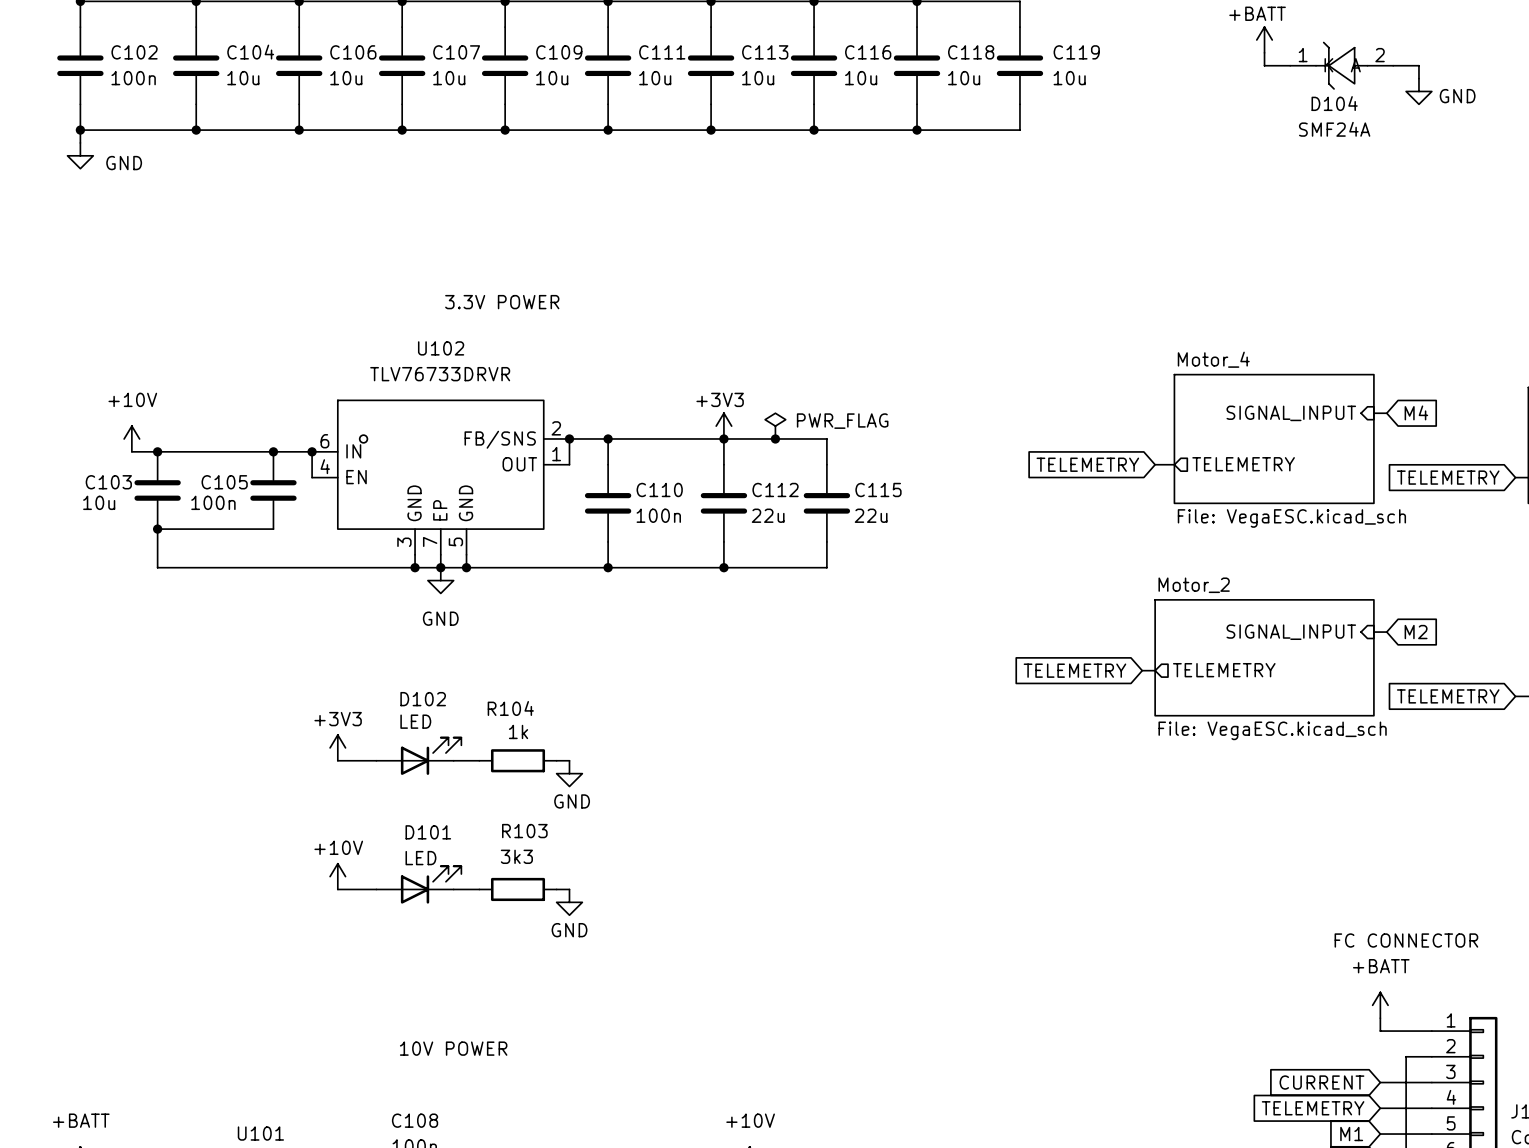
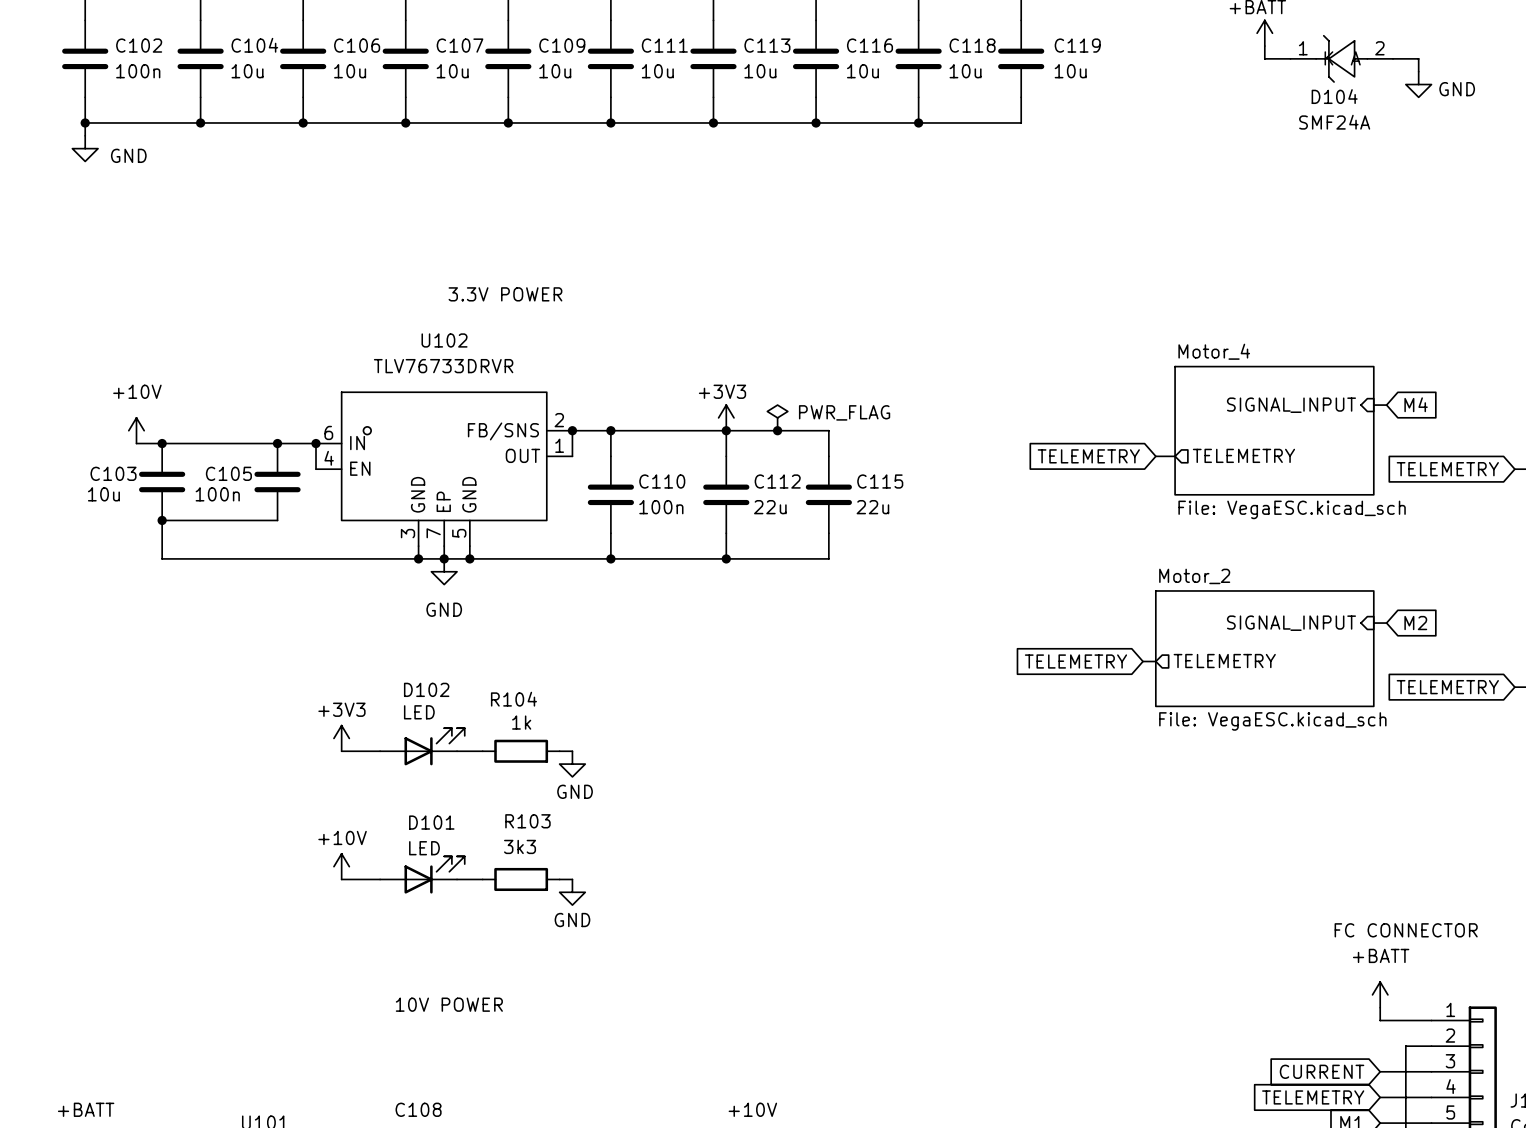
text position: 10V POWER (453, 1048) -> 10V POWER (449, 1004)

